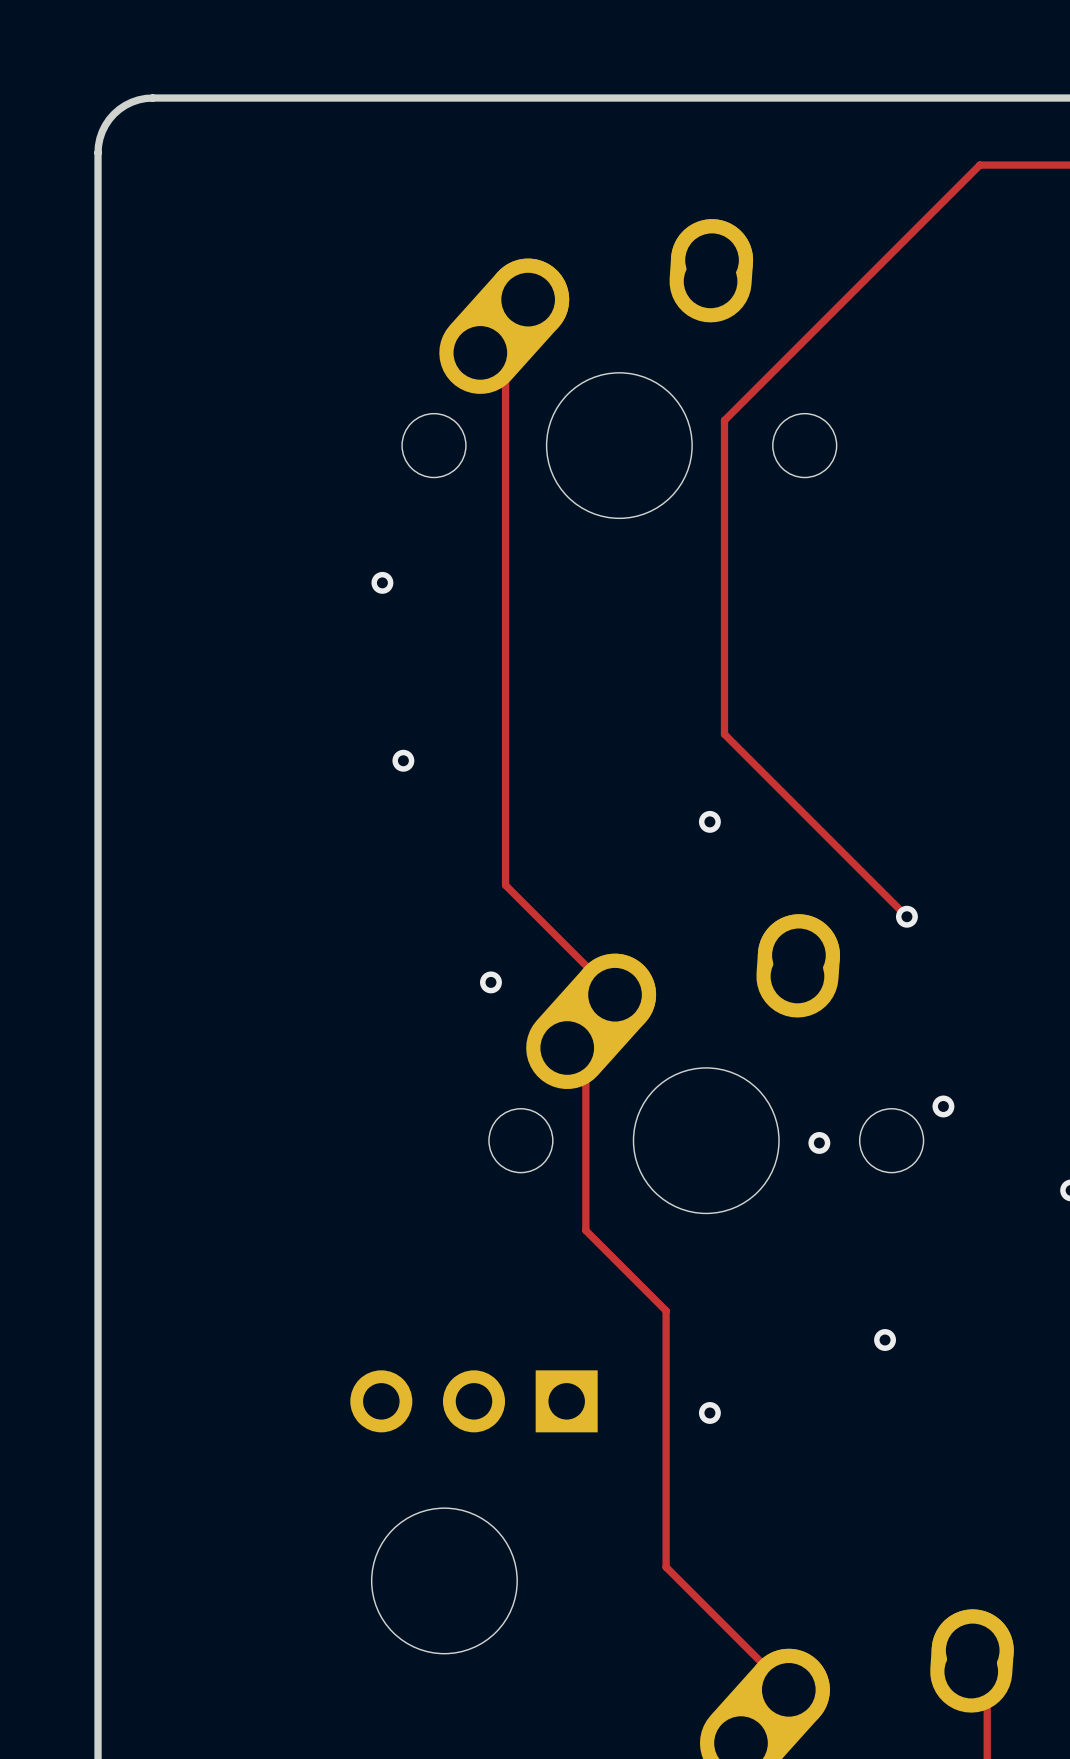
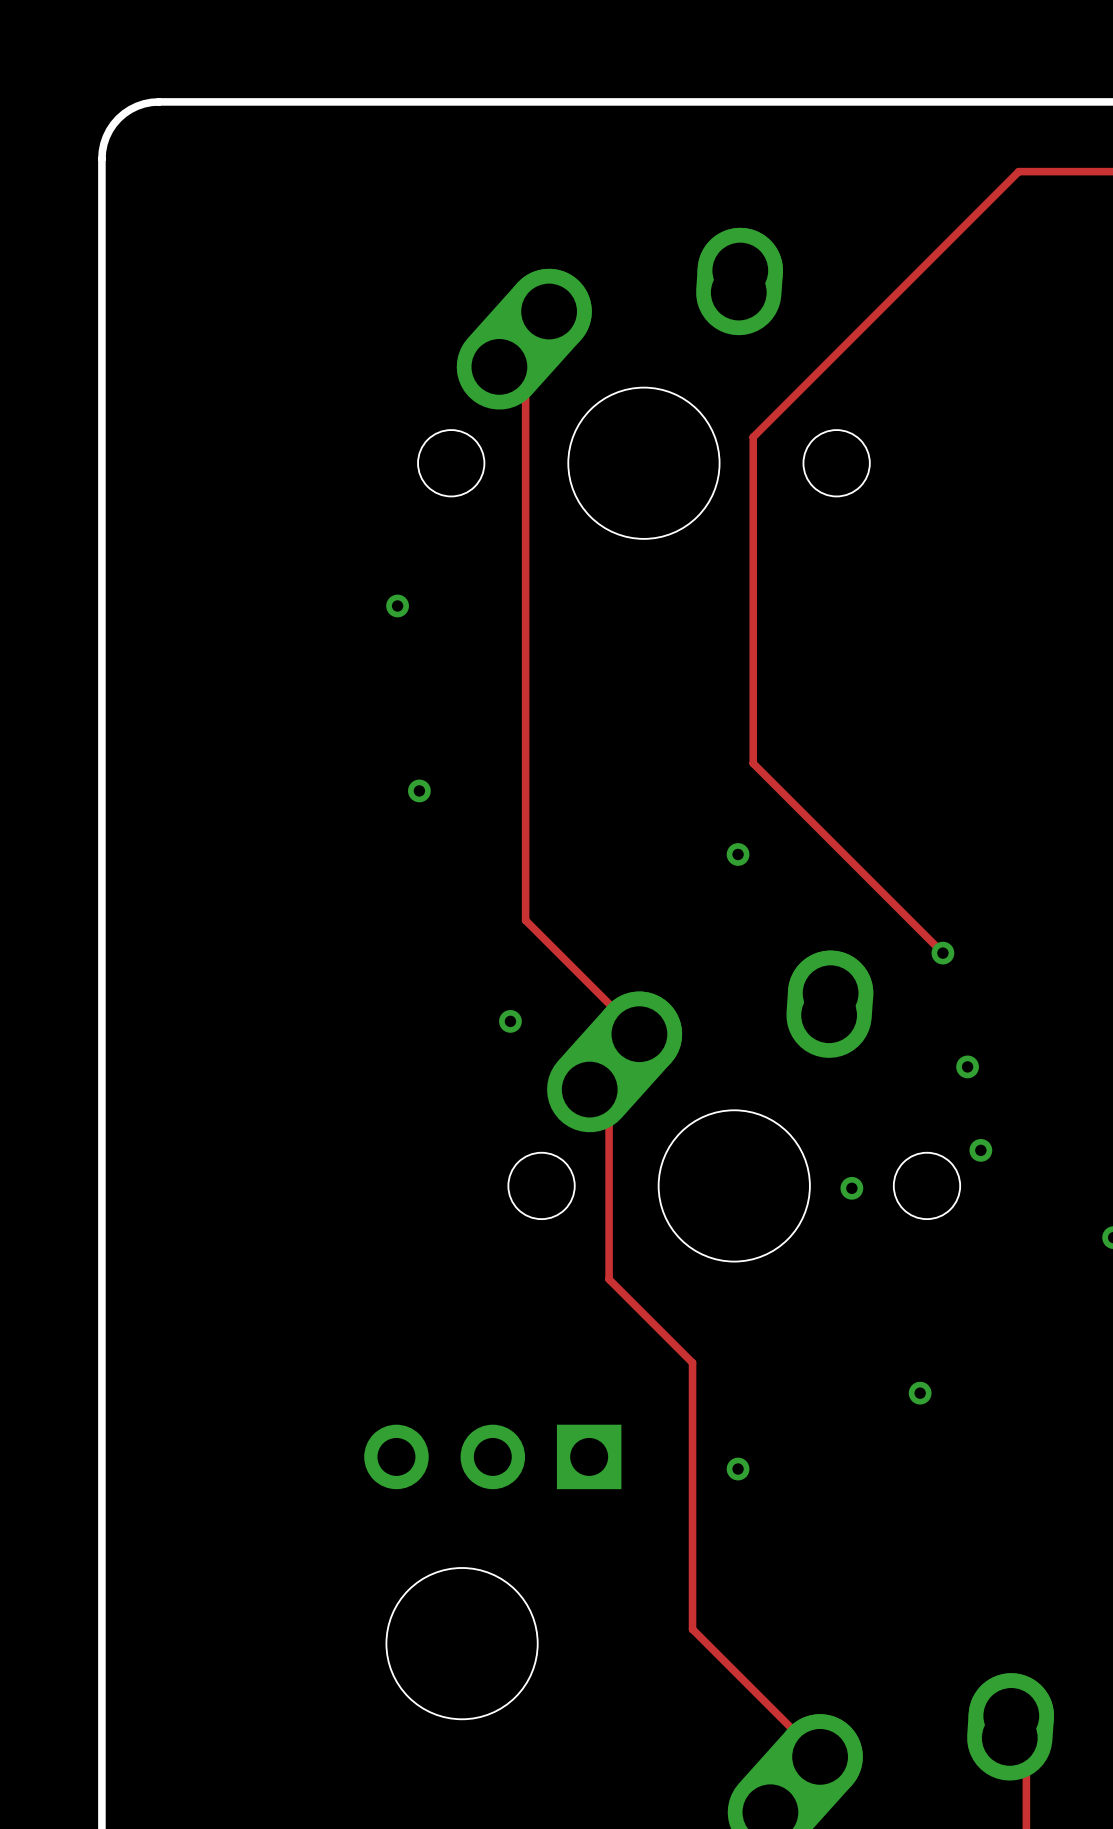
via: none -> (967, 1066)

